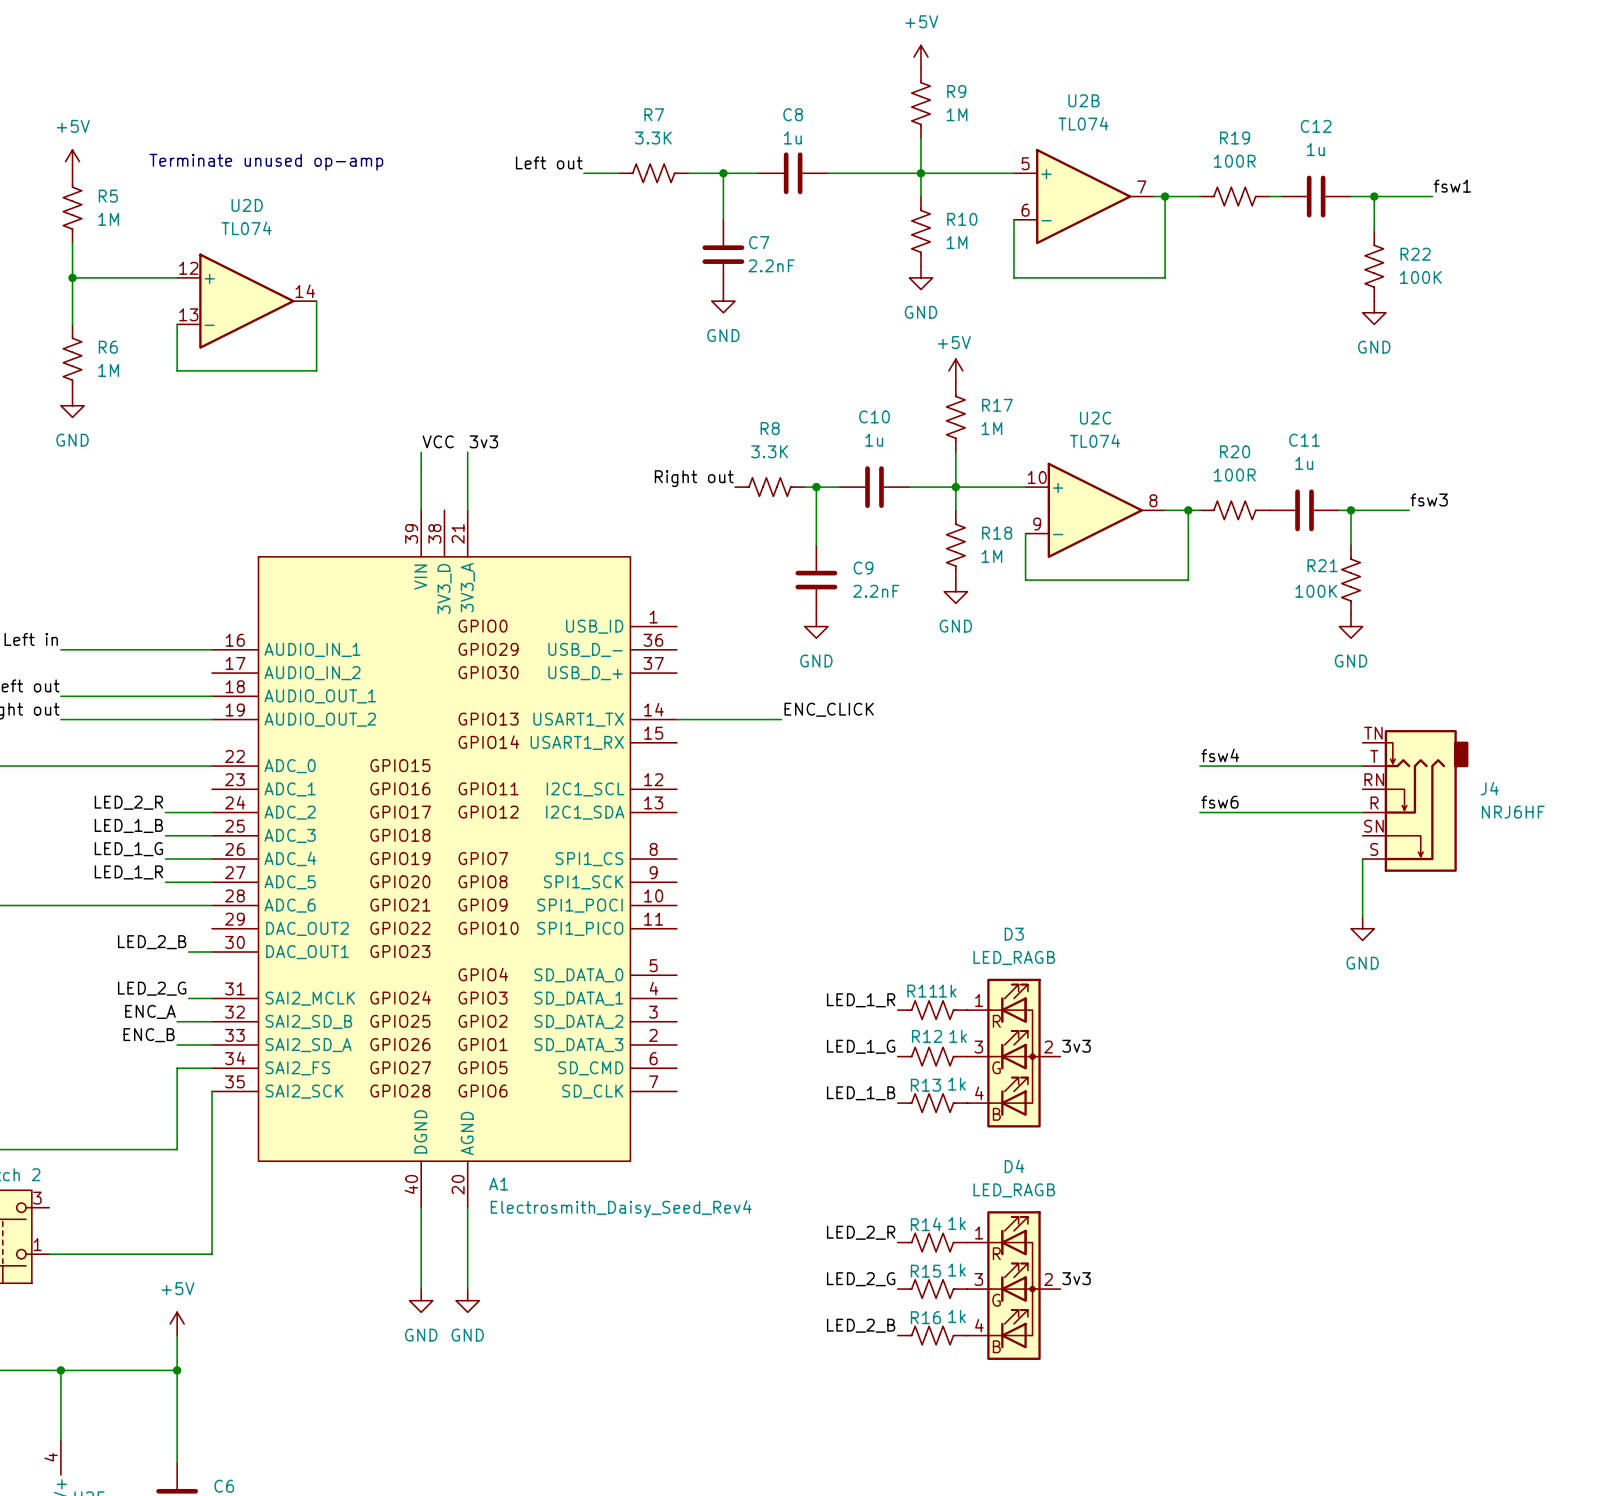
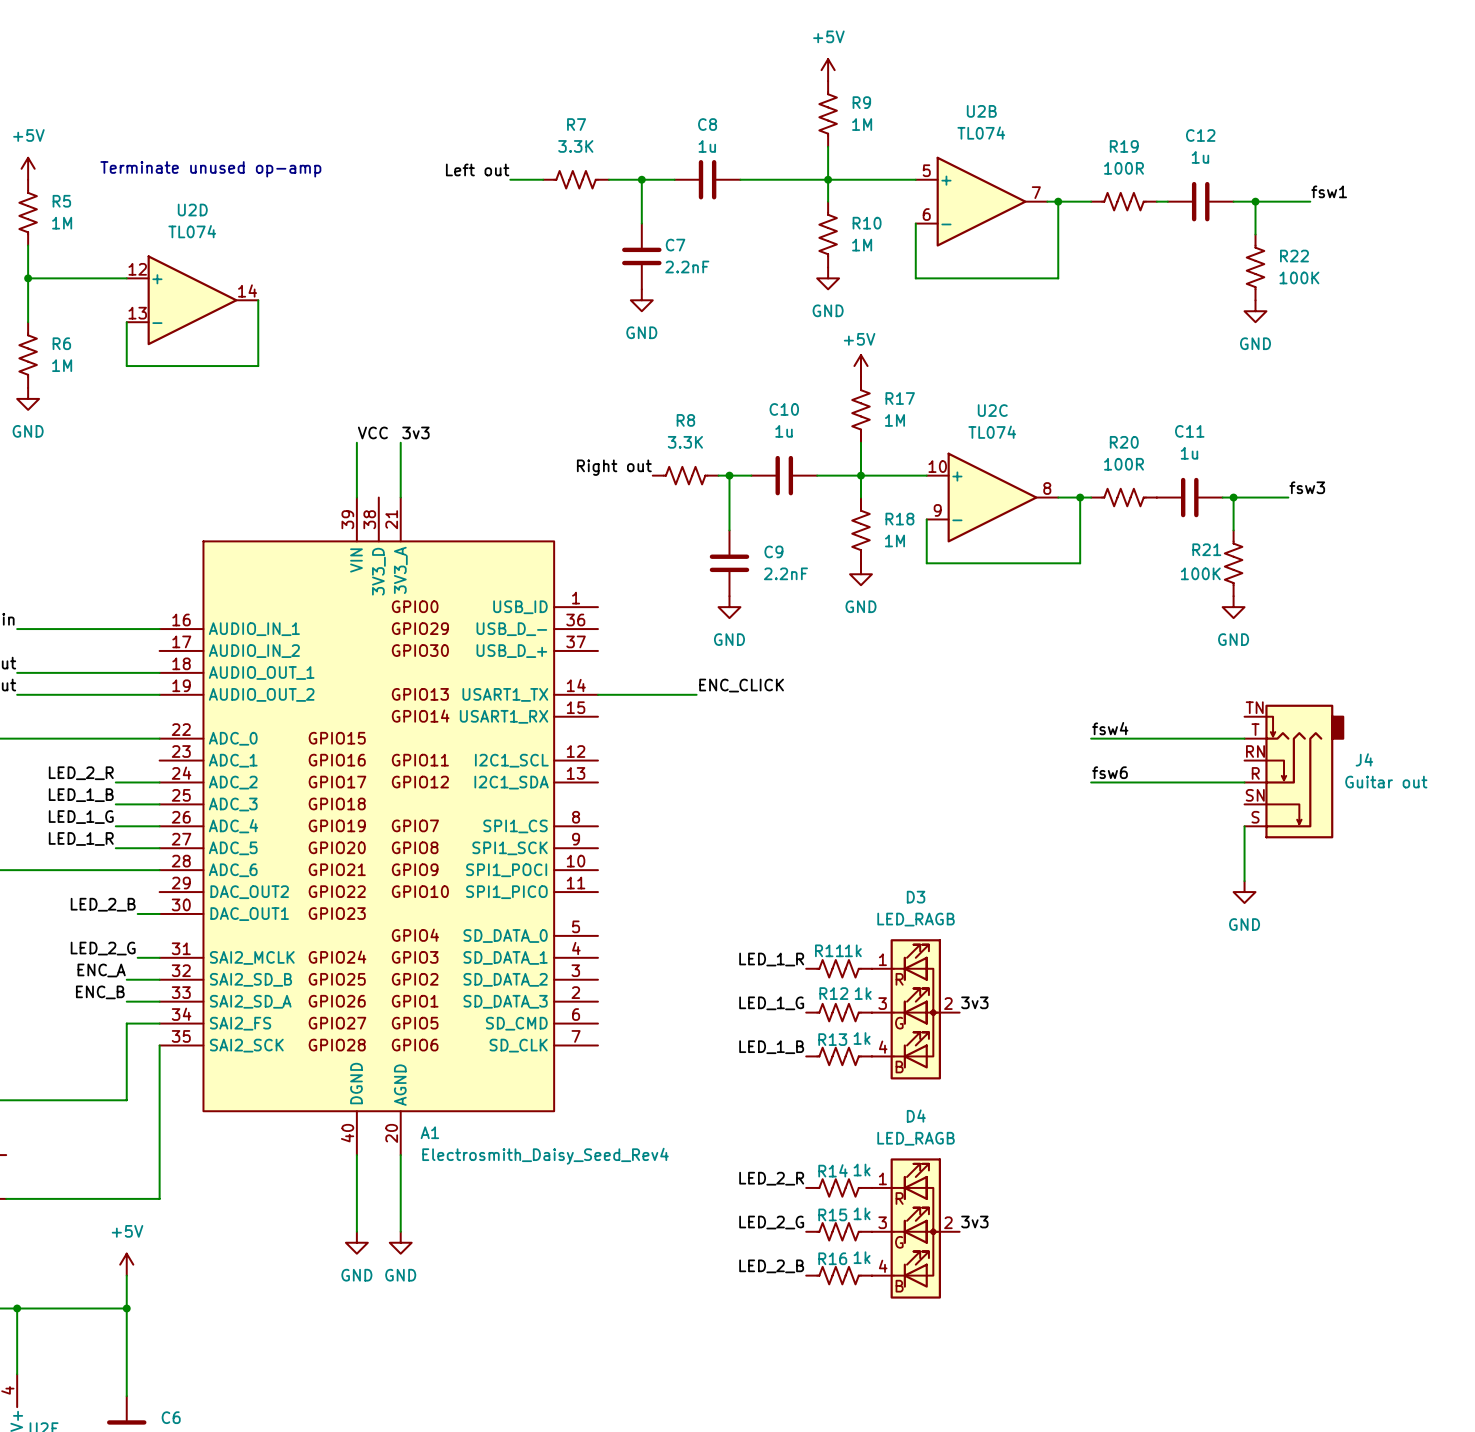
J4 value: NRJ6HF (1513, 812) -> Guitar out (1386, 782)

